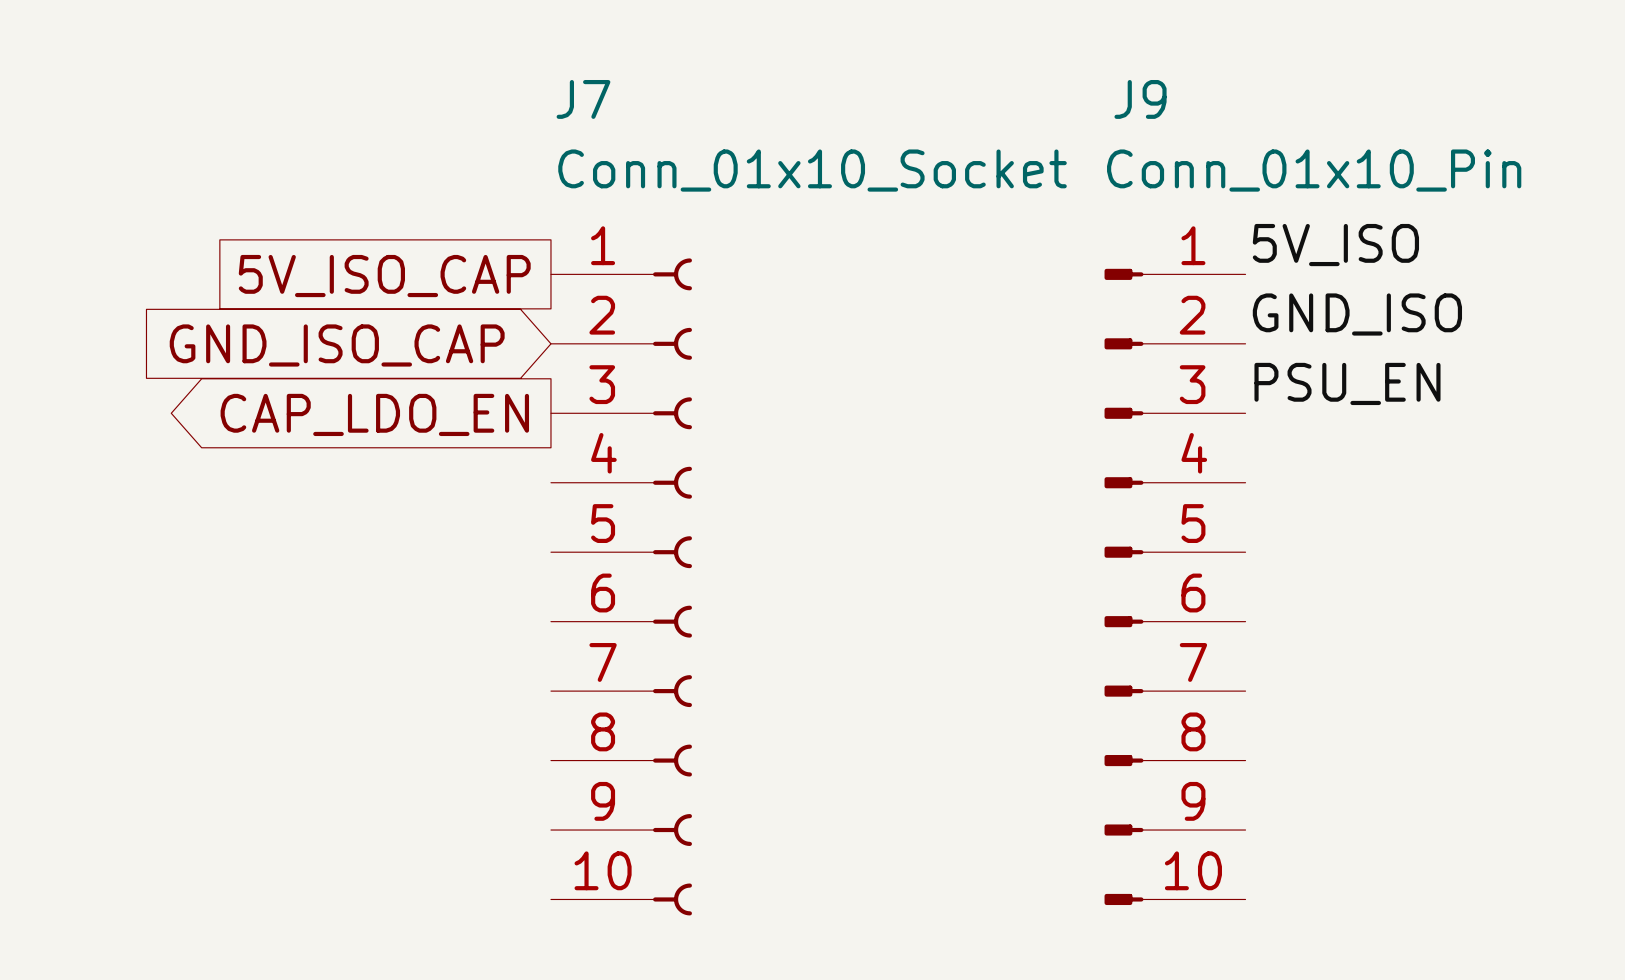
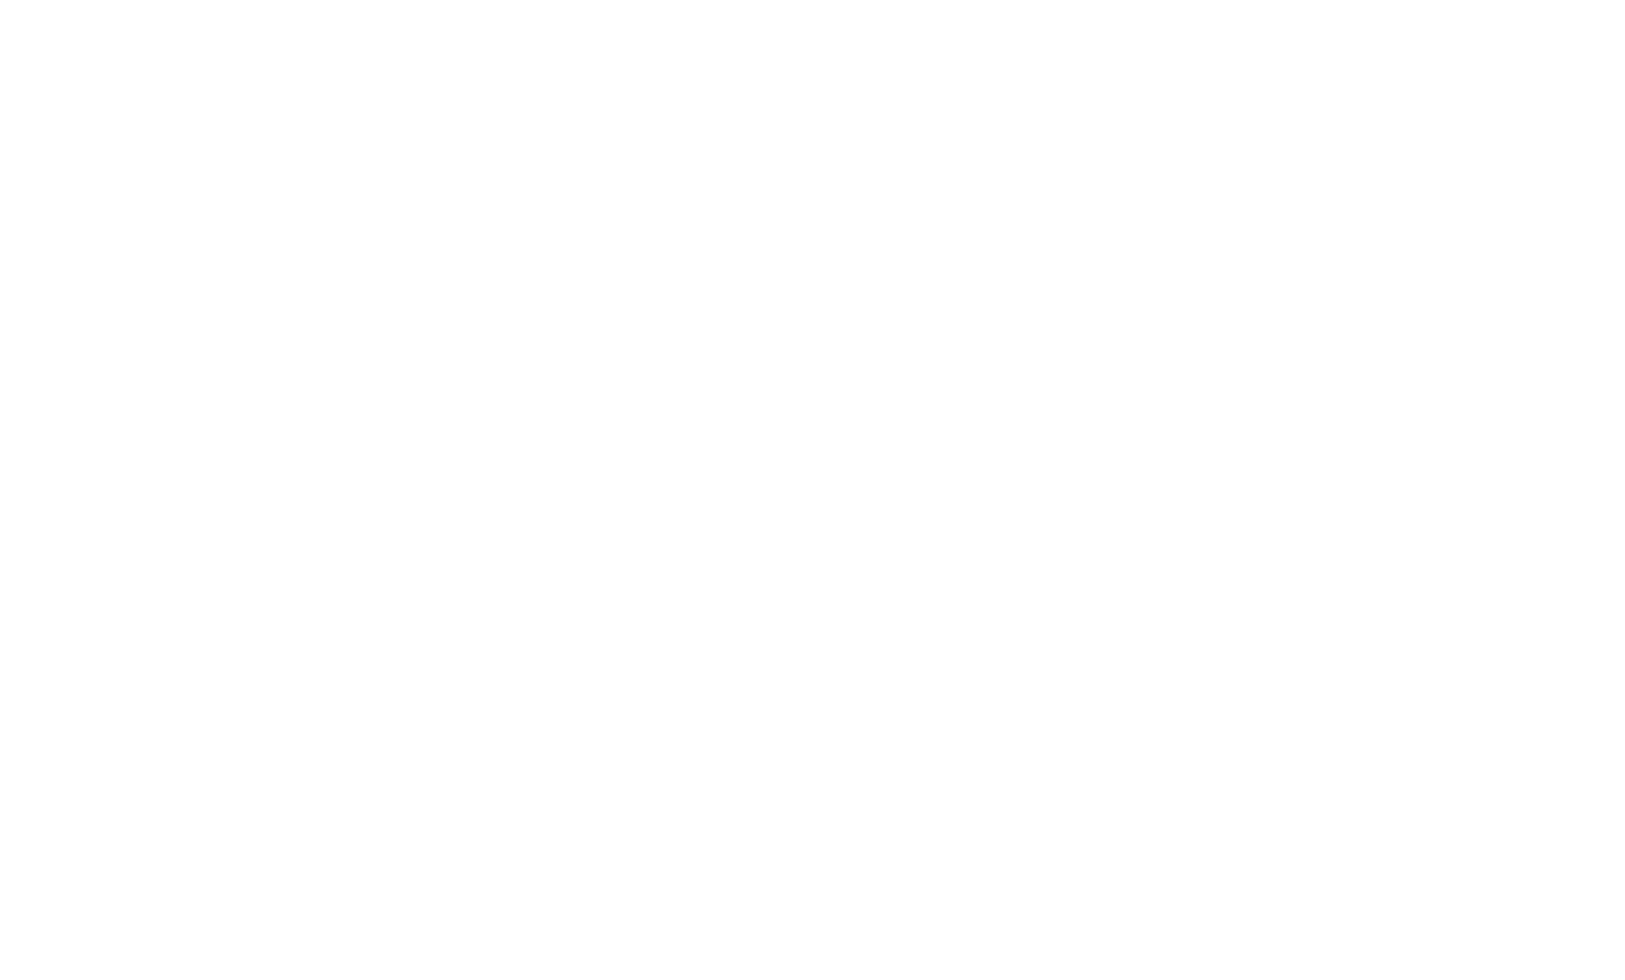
label: 5V_ISO (1335, 245) -> none
global label: 5V_ISO_CAP (384, 276) -> none
label: GND_ISO (1357, 314) -> none
global label: GND_ISO_CAP (337, 345) -> none
label: PSU_EN (1347, 383) -> none
global label: CAP_LDO_EN (374, 414) -> none
J7: Conn_01x10_Socket (621, 586) -> none
J9: Conn_01x10_Pin (1175, 586) -> none

